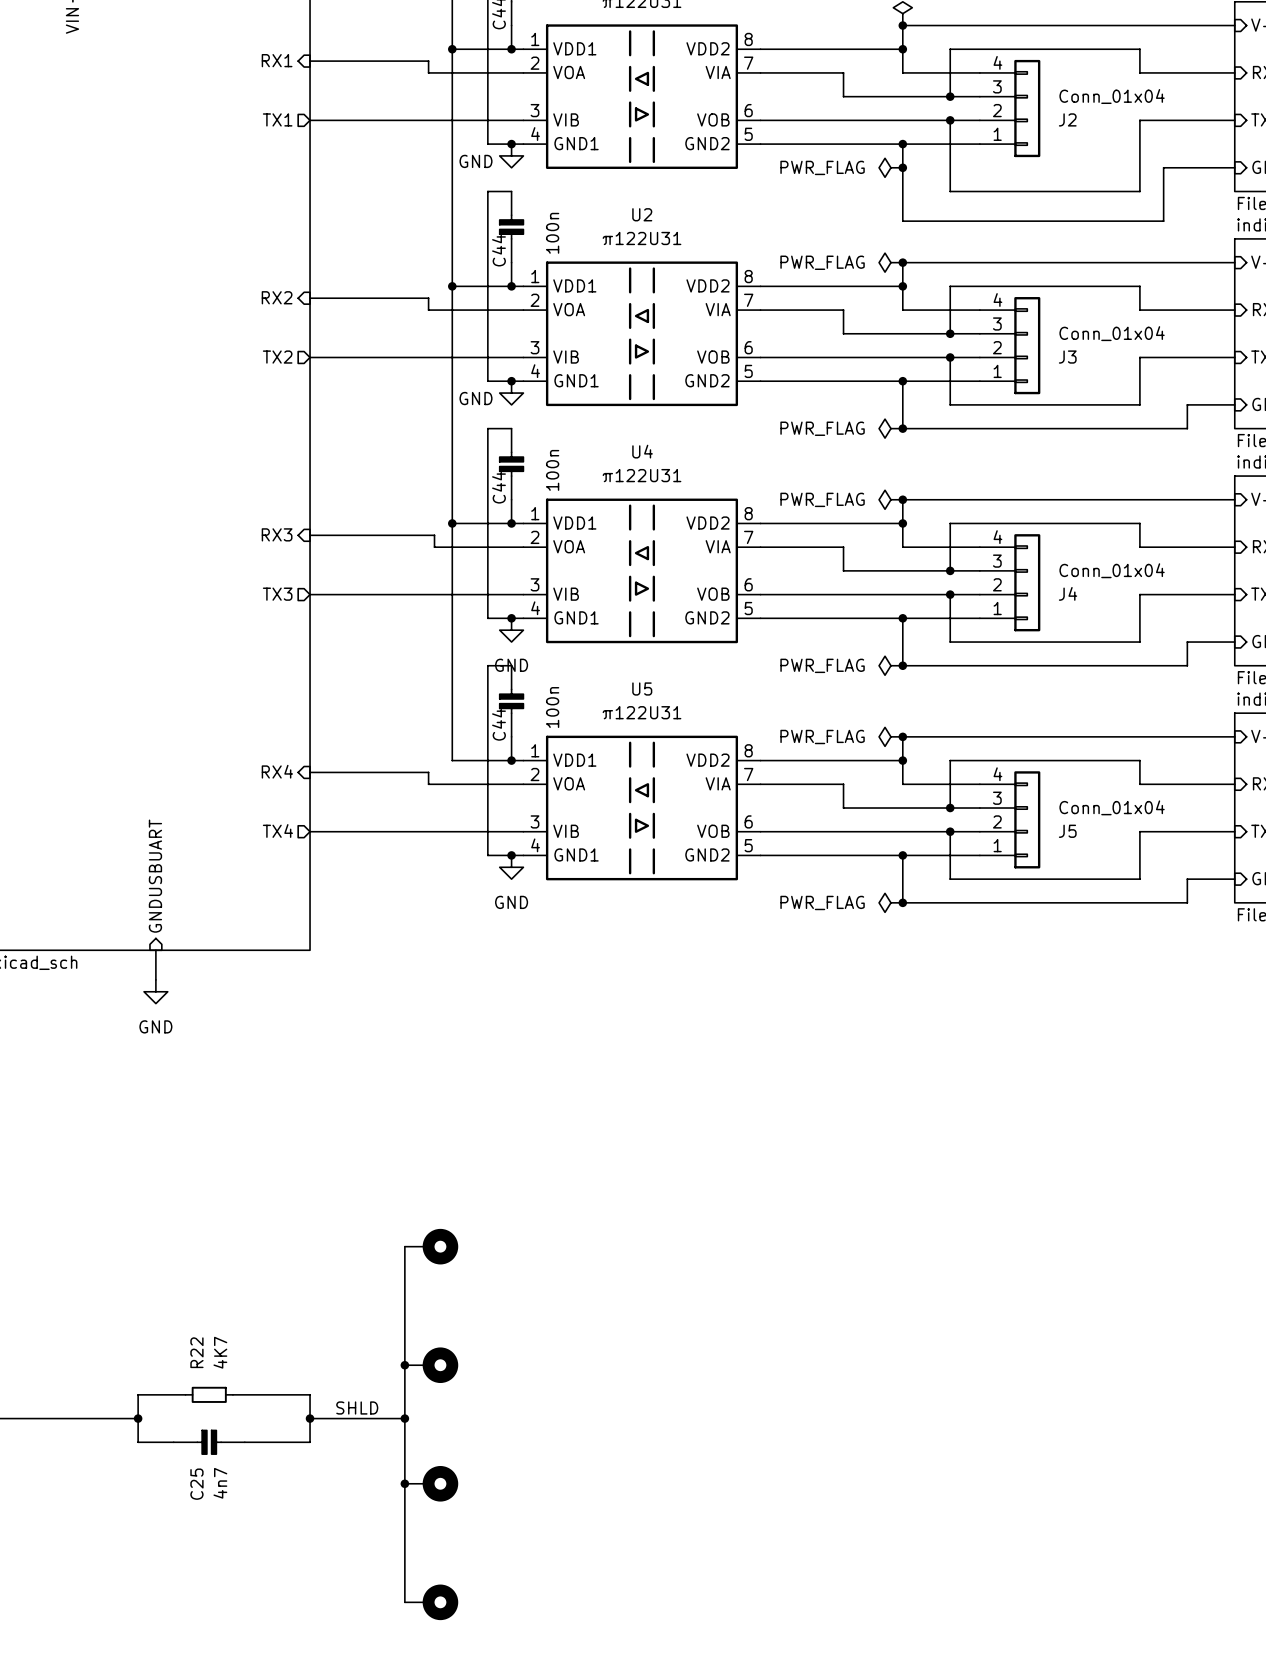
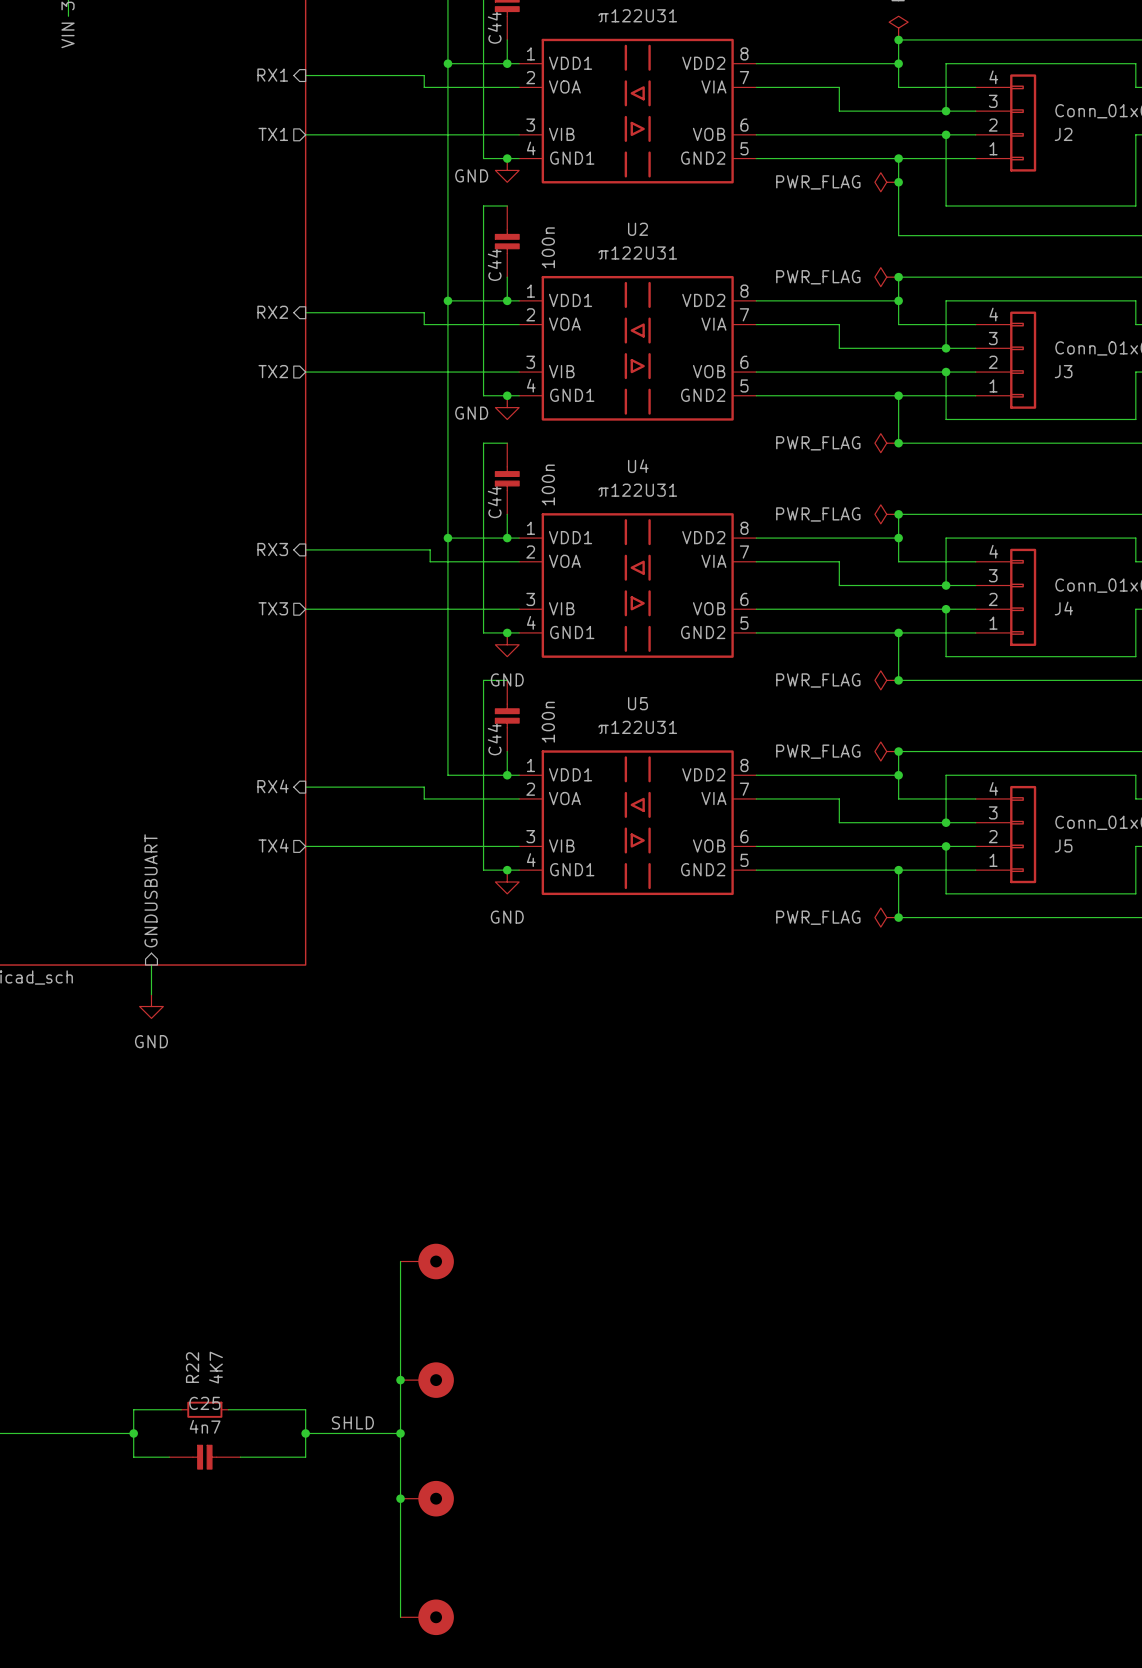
C25 value rotation: 0° (220, 1483) -> 90° clockwise (205, 1426)
C25 value position: 4n7 (220, 1483) -> 4n7 (205, 1426)
C25 name rotation: 0° (196, 1484) -> 90° clockwise (204, 1403)
C25 name position: C25 (196, 1484) -> C25 (204, 1403)

